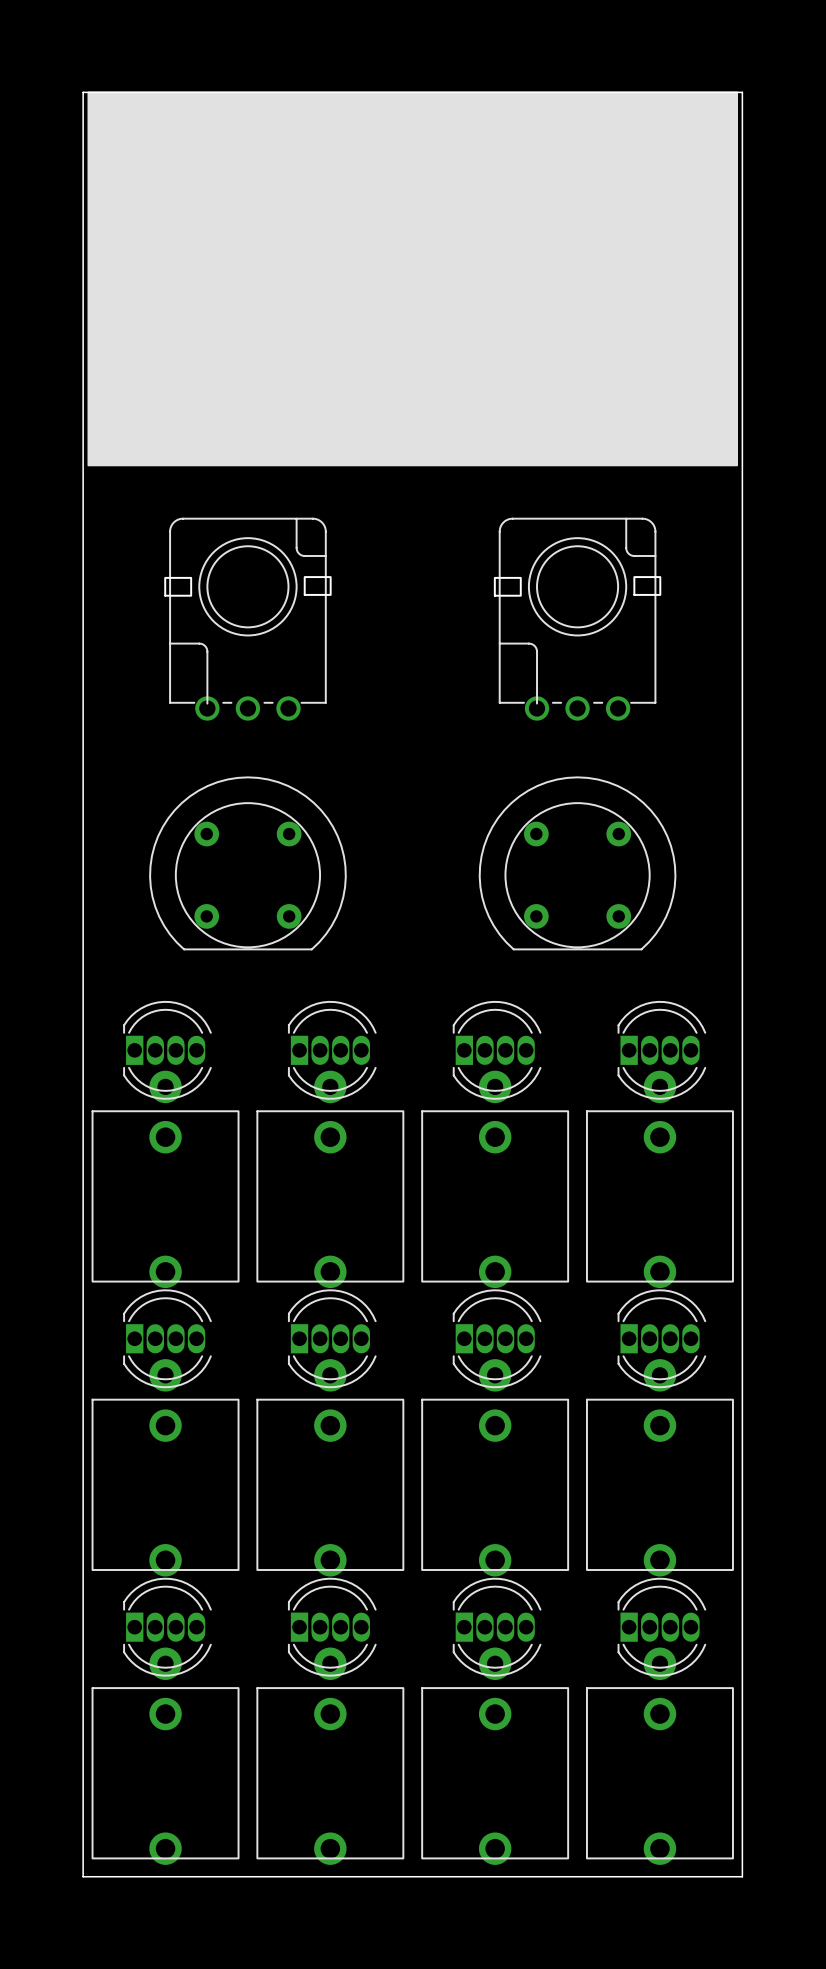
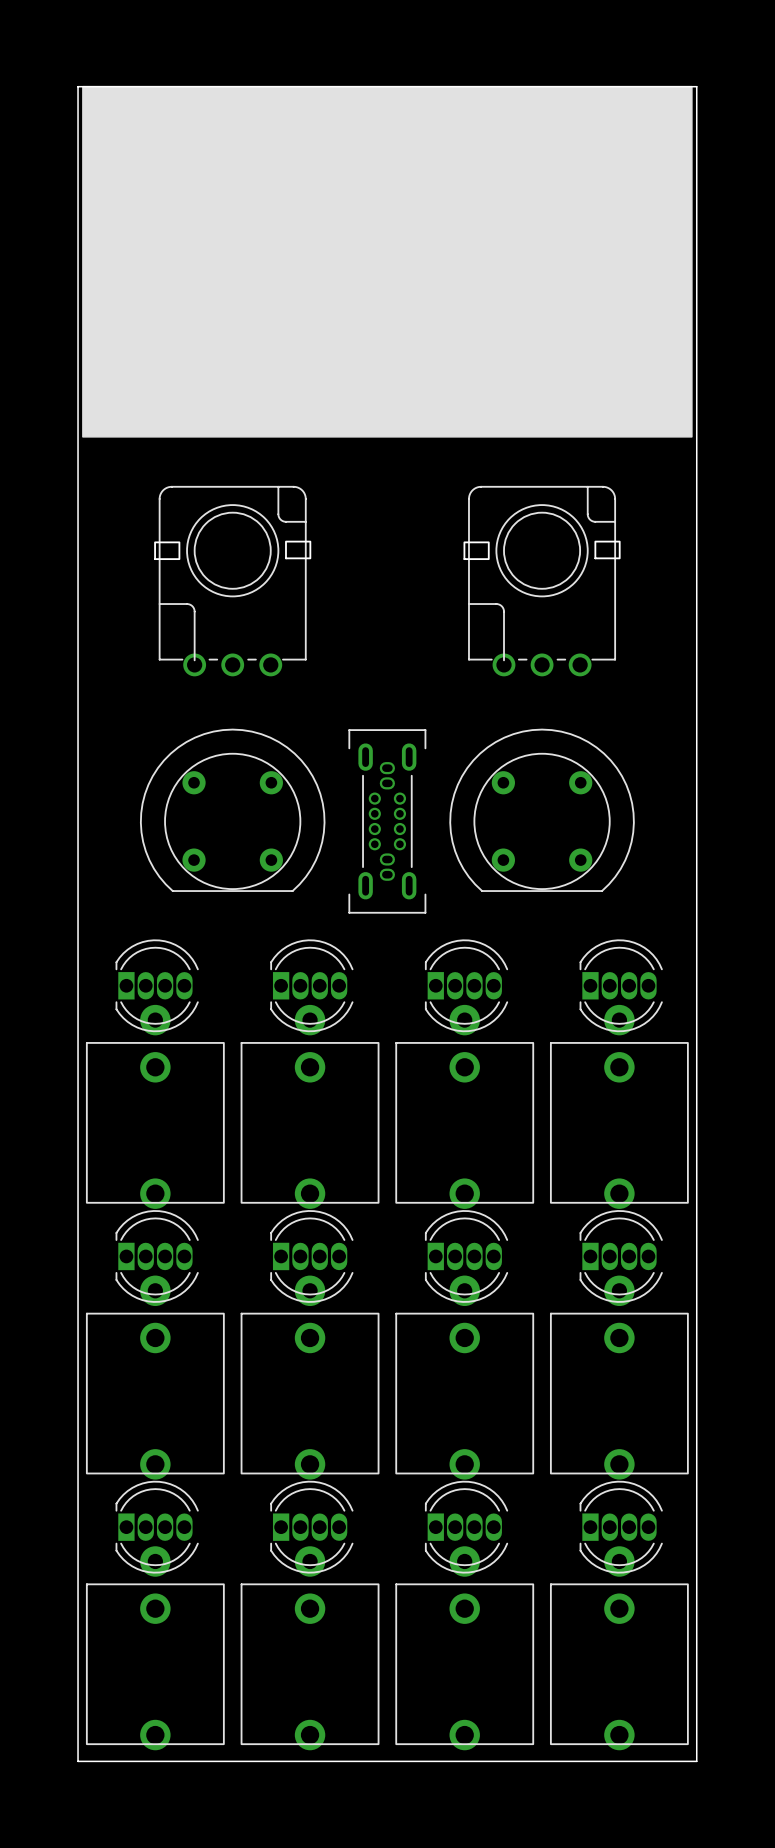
part: none -> (387, 821)

